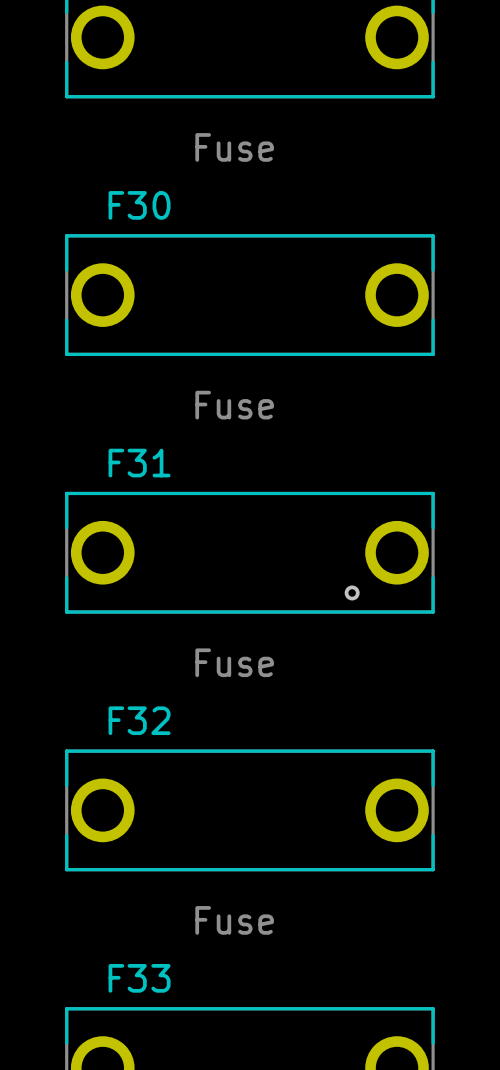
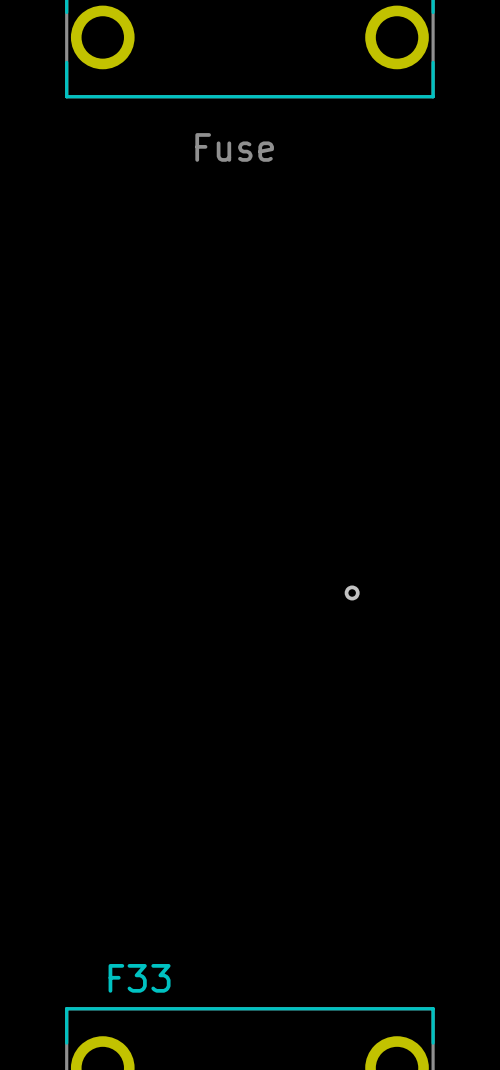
F30: Fuse (249, 295) -> none
F31: Fuse (249, 552) -> none
F32: Fuse (249, 810) -> none

